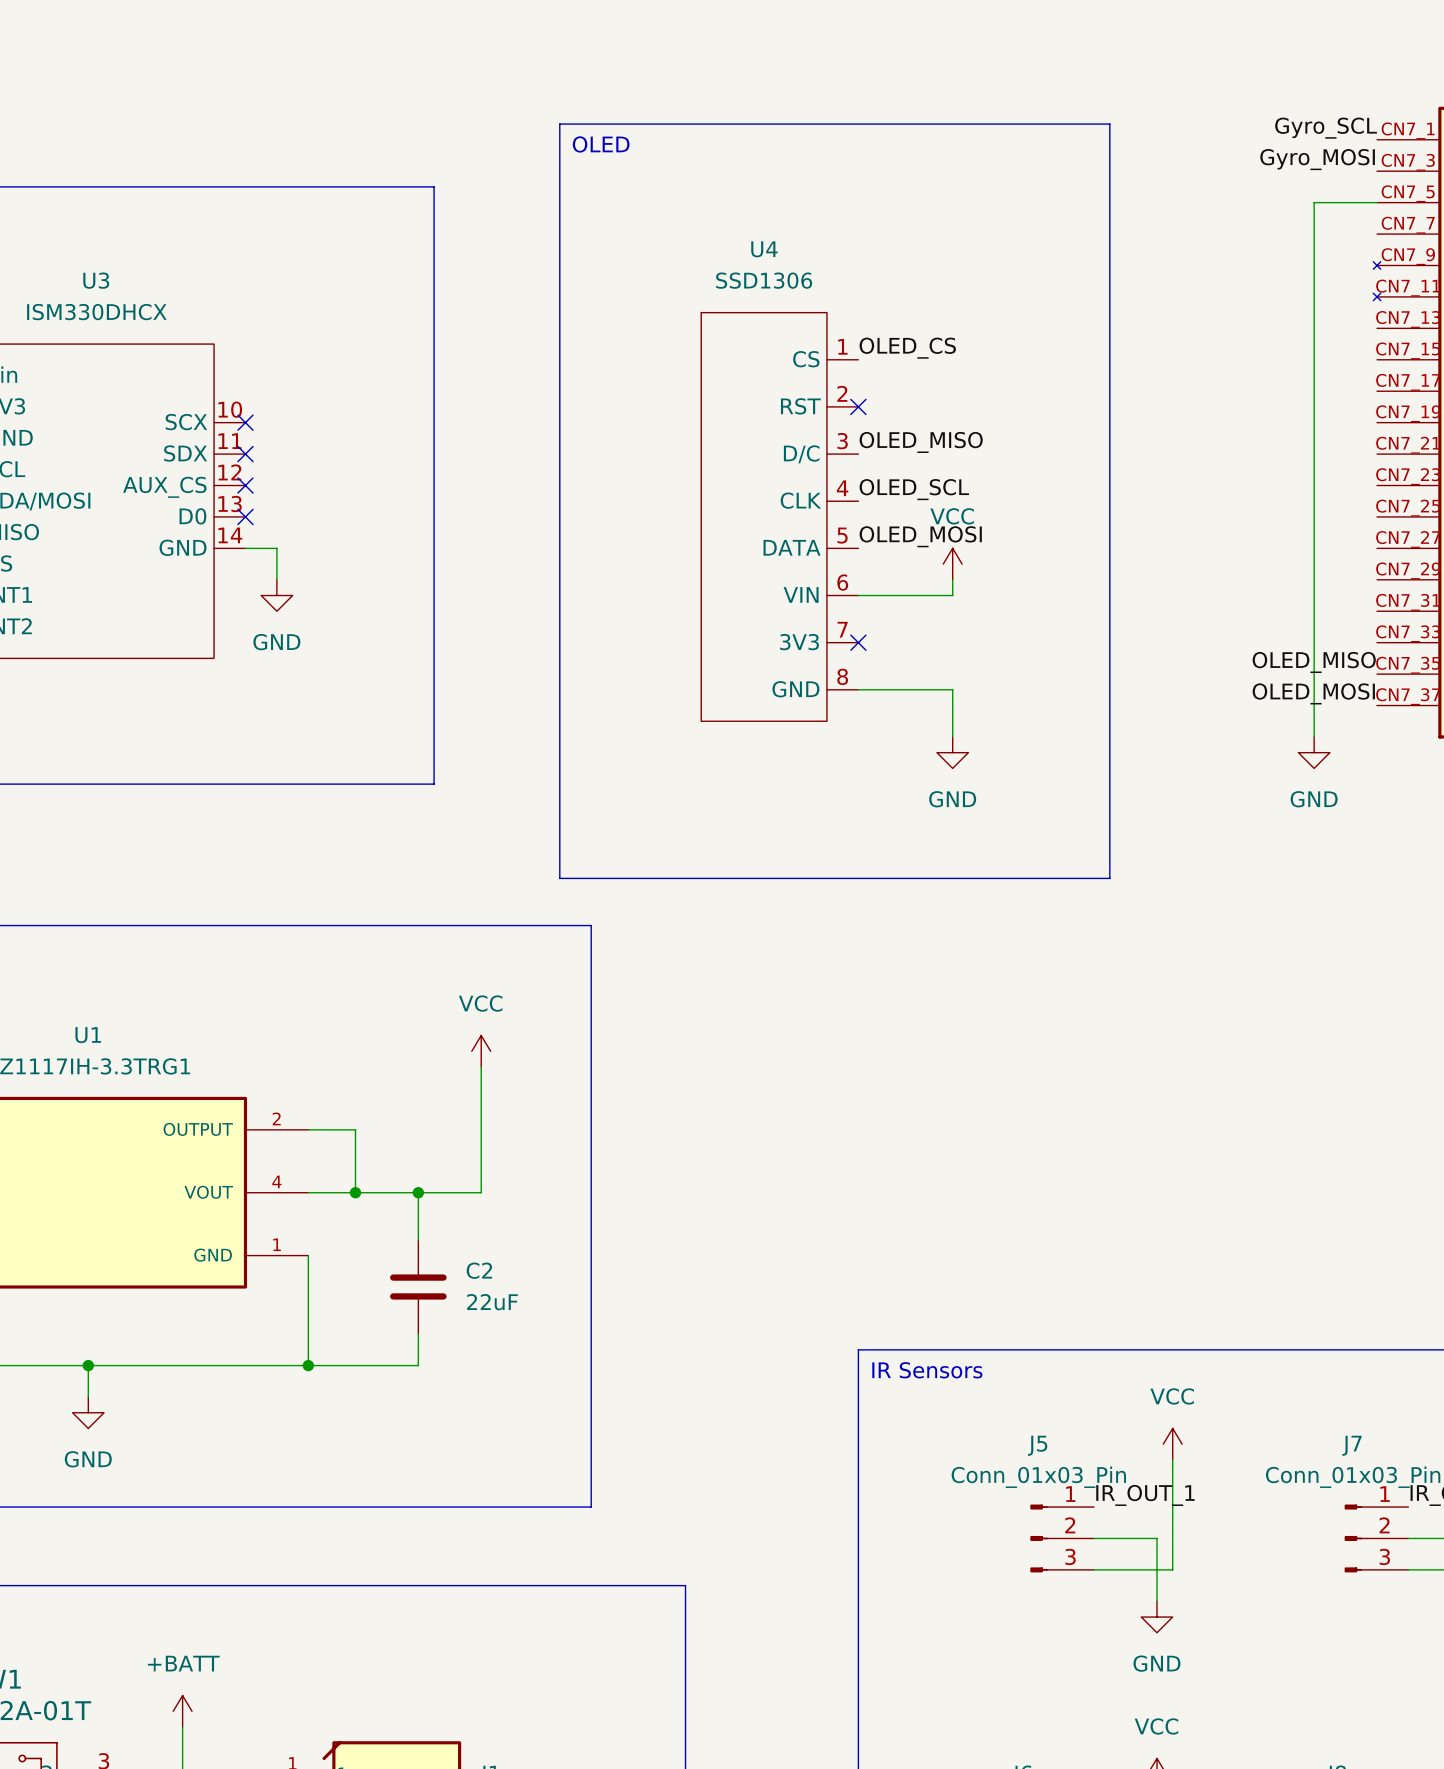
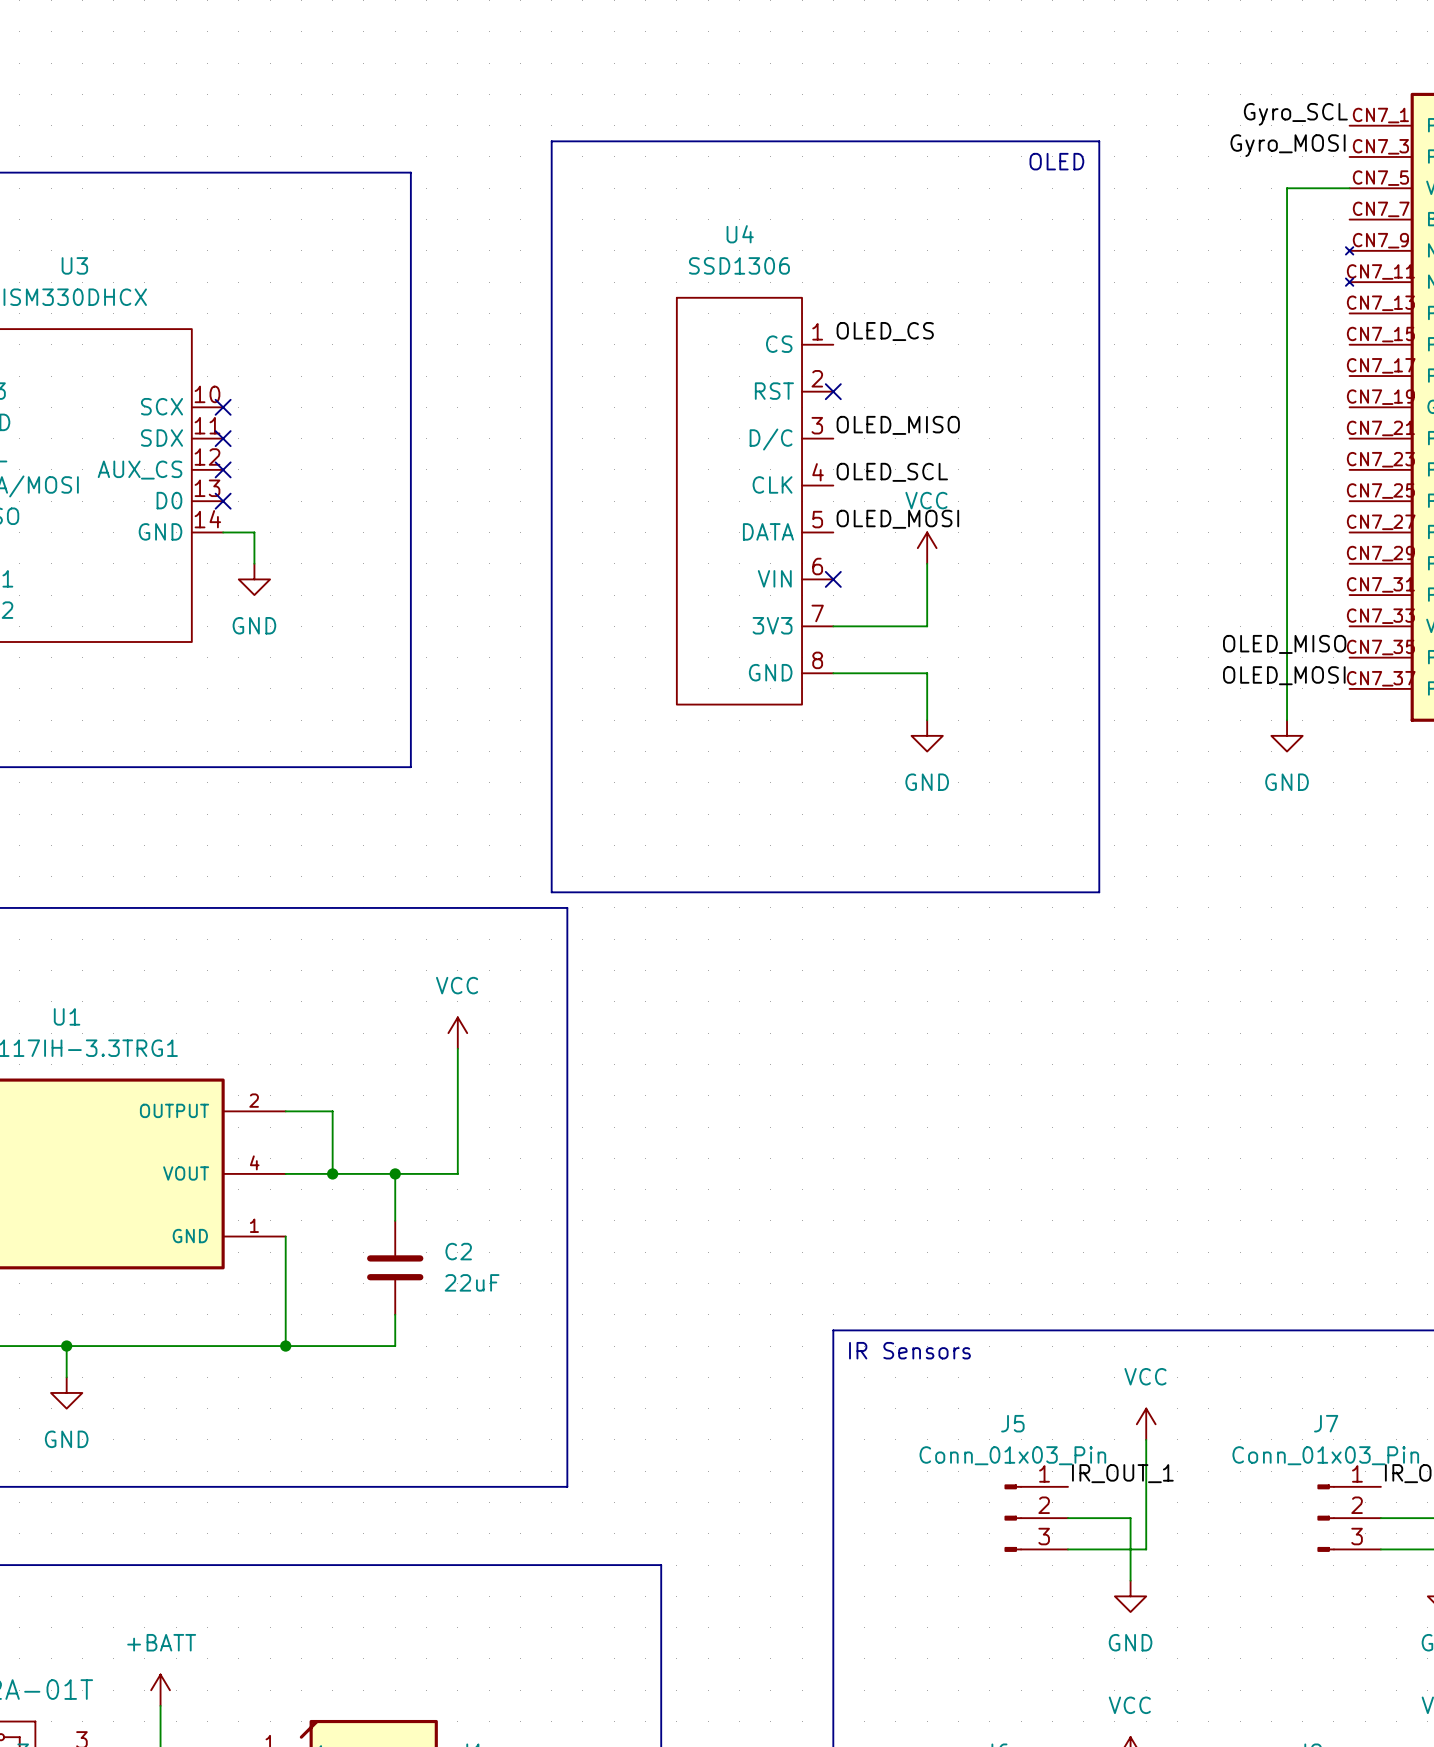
line: (559, 124) (1109, 124) (1109, 878) (559, 878) (559, 124) -> (551, 141) (551, 892) (1099, 892) (1099, 141) (551, 141)
text: OLED (601, 144) -> none
text: none -> OLED (1056, 161)
wire: (858, 595) (952, 595) -> (833, 626) (927, 626) (927, 579)
no-connect mark position: (858, 642) -> (833, 579)

